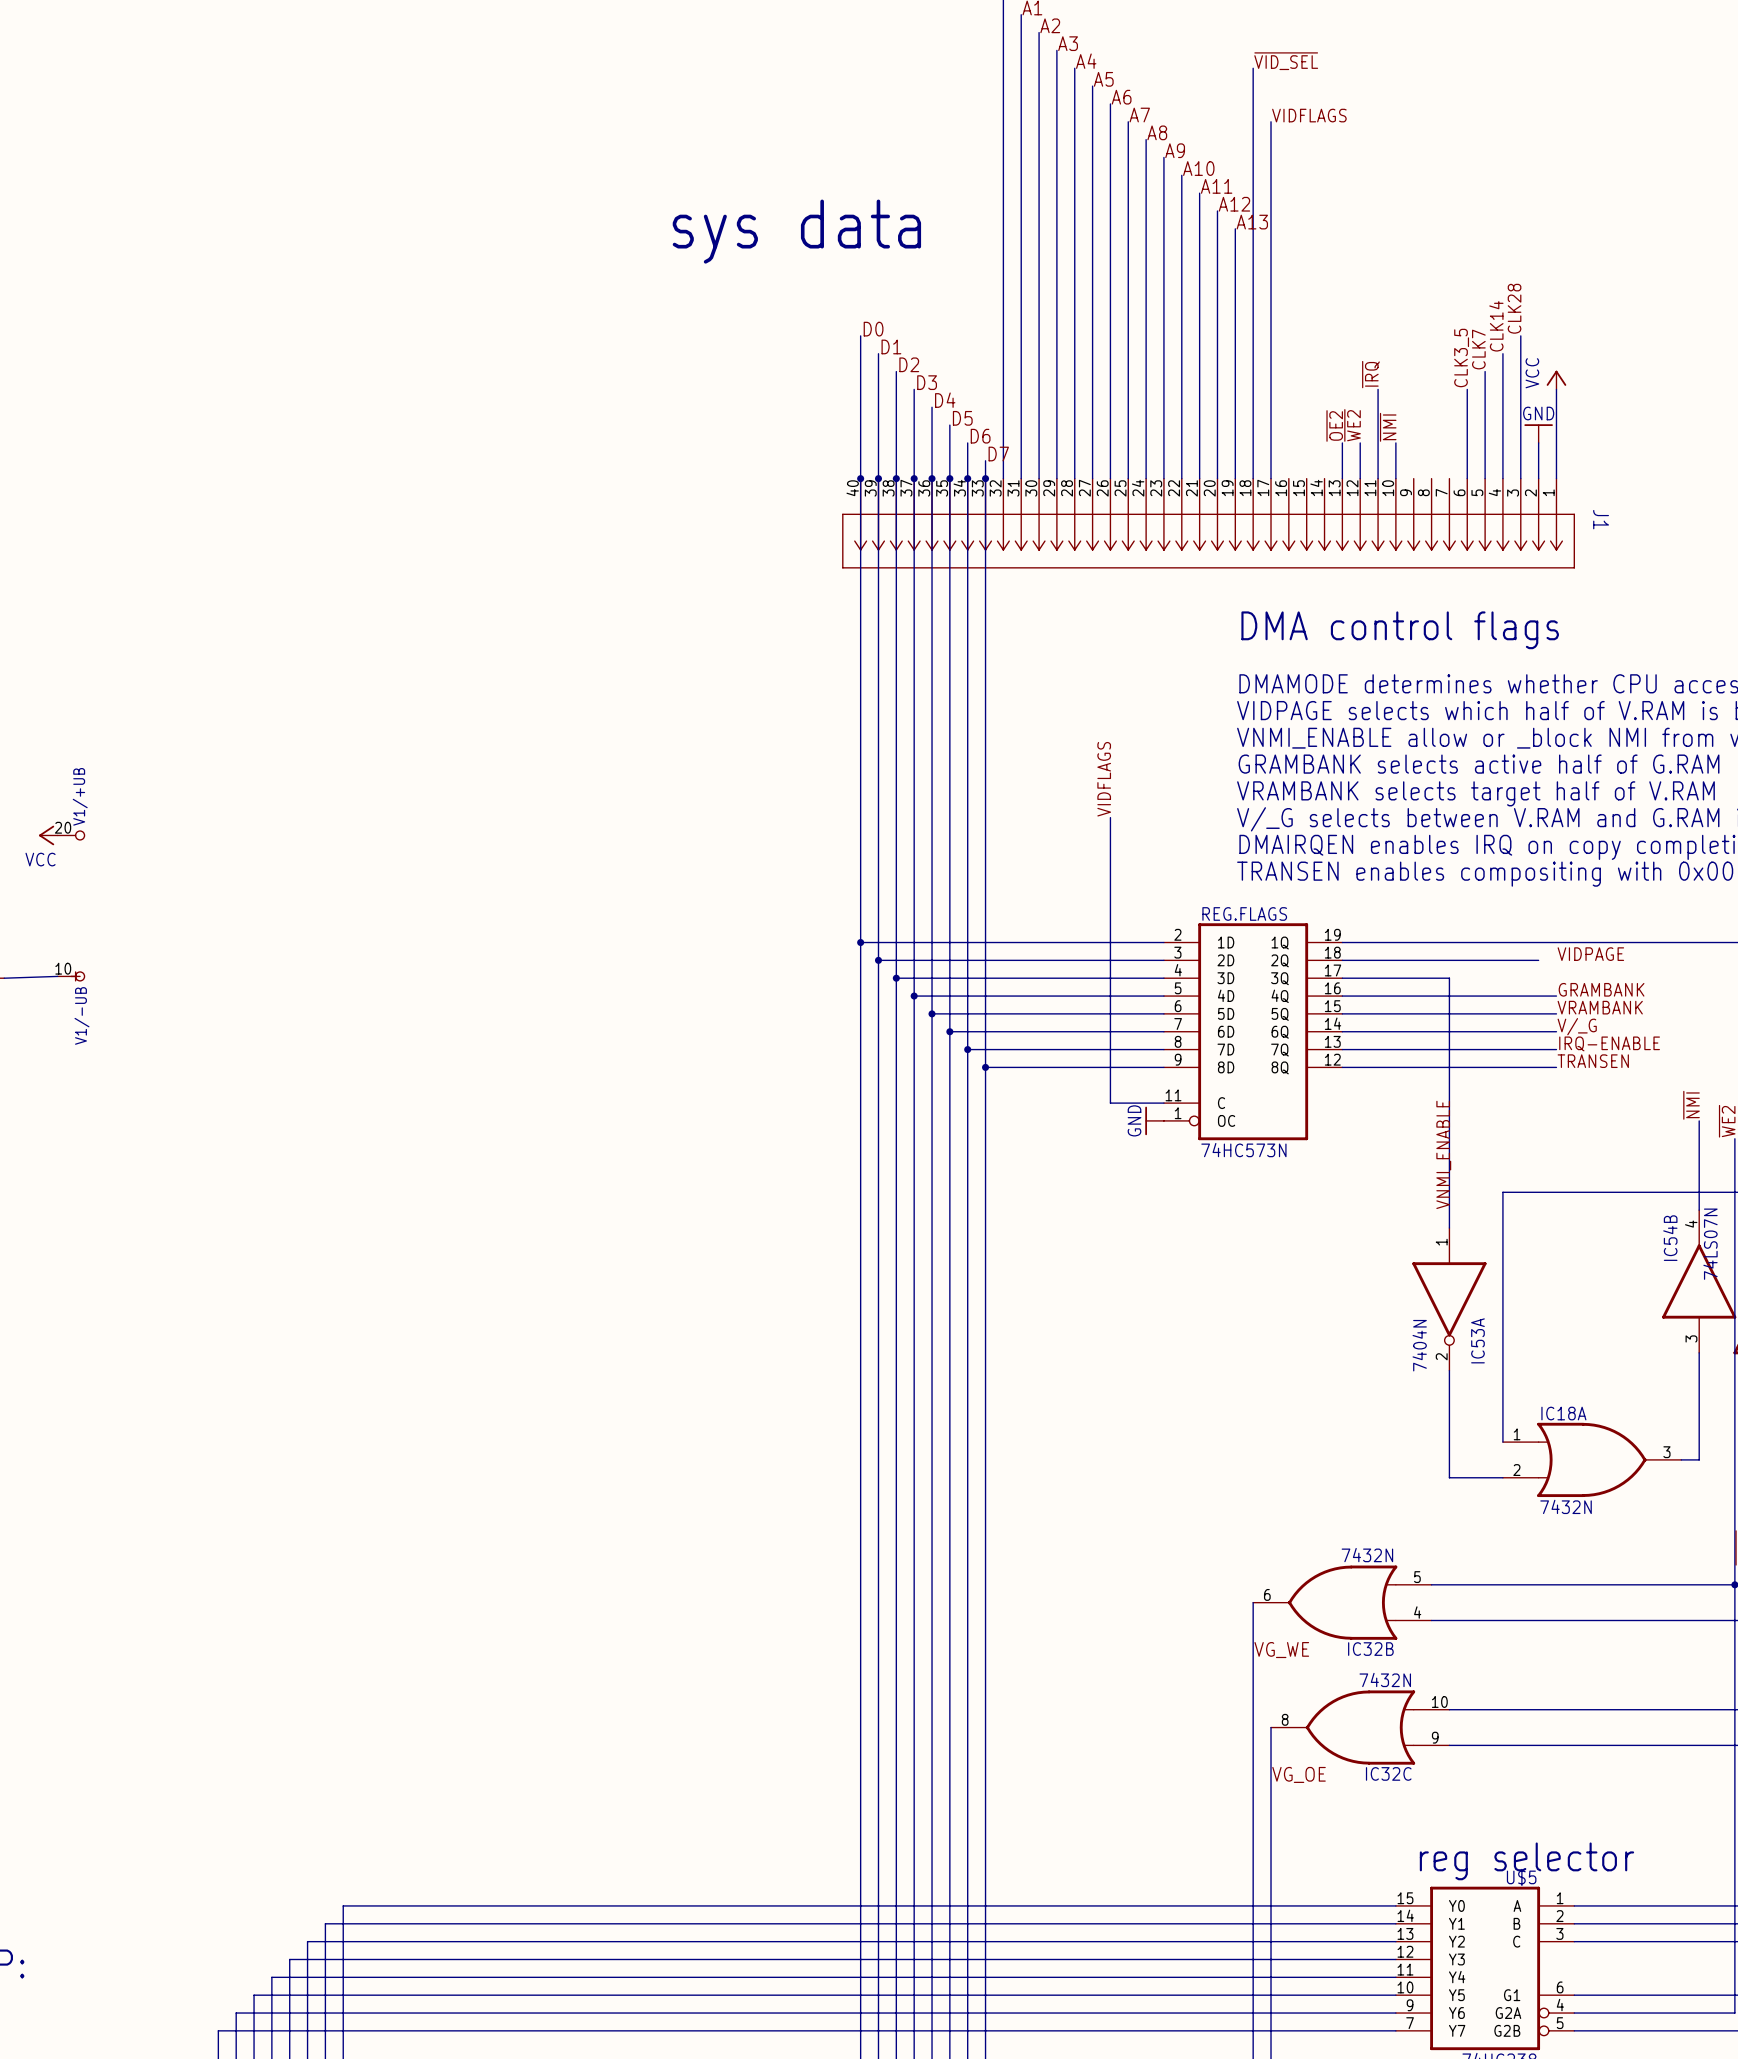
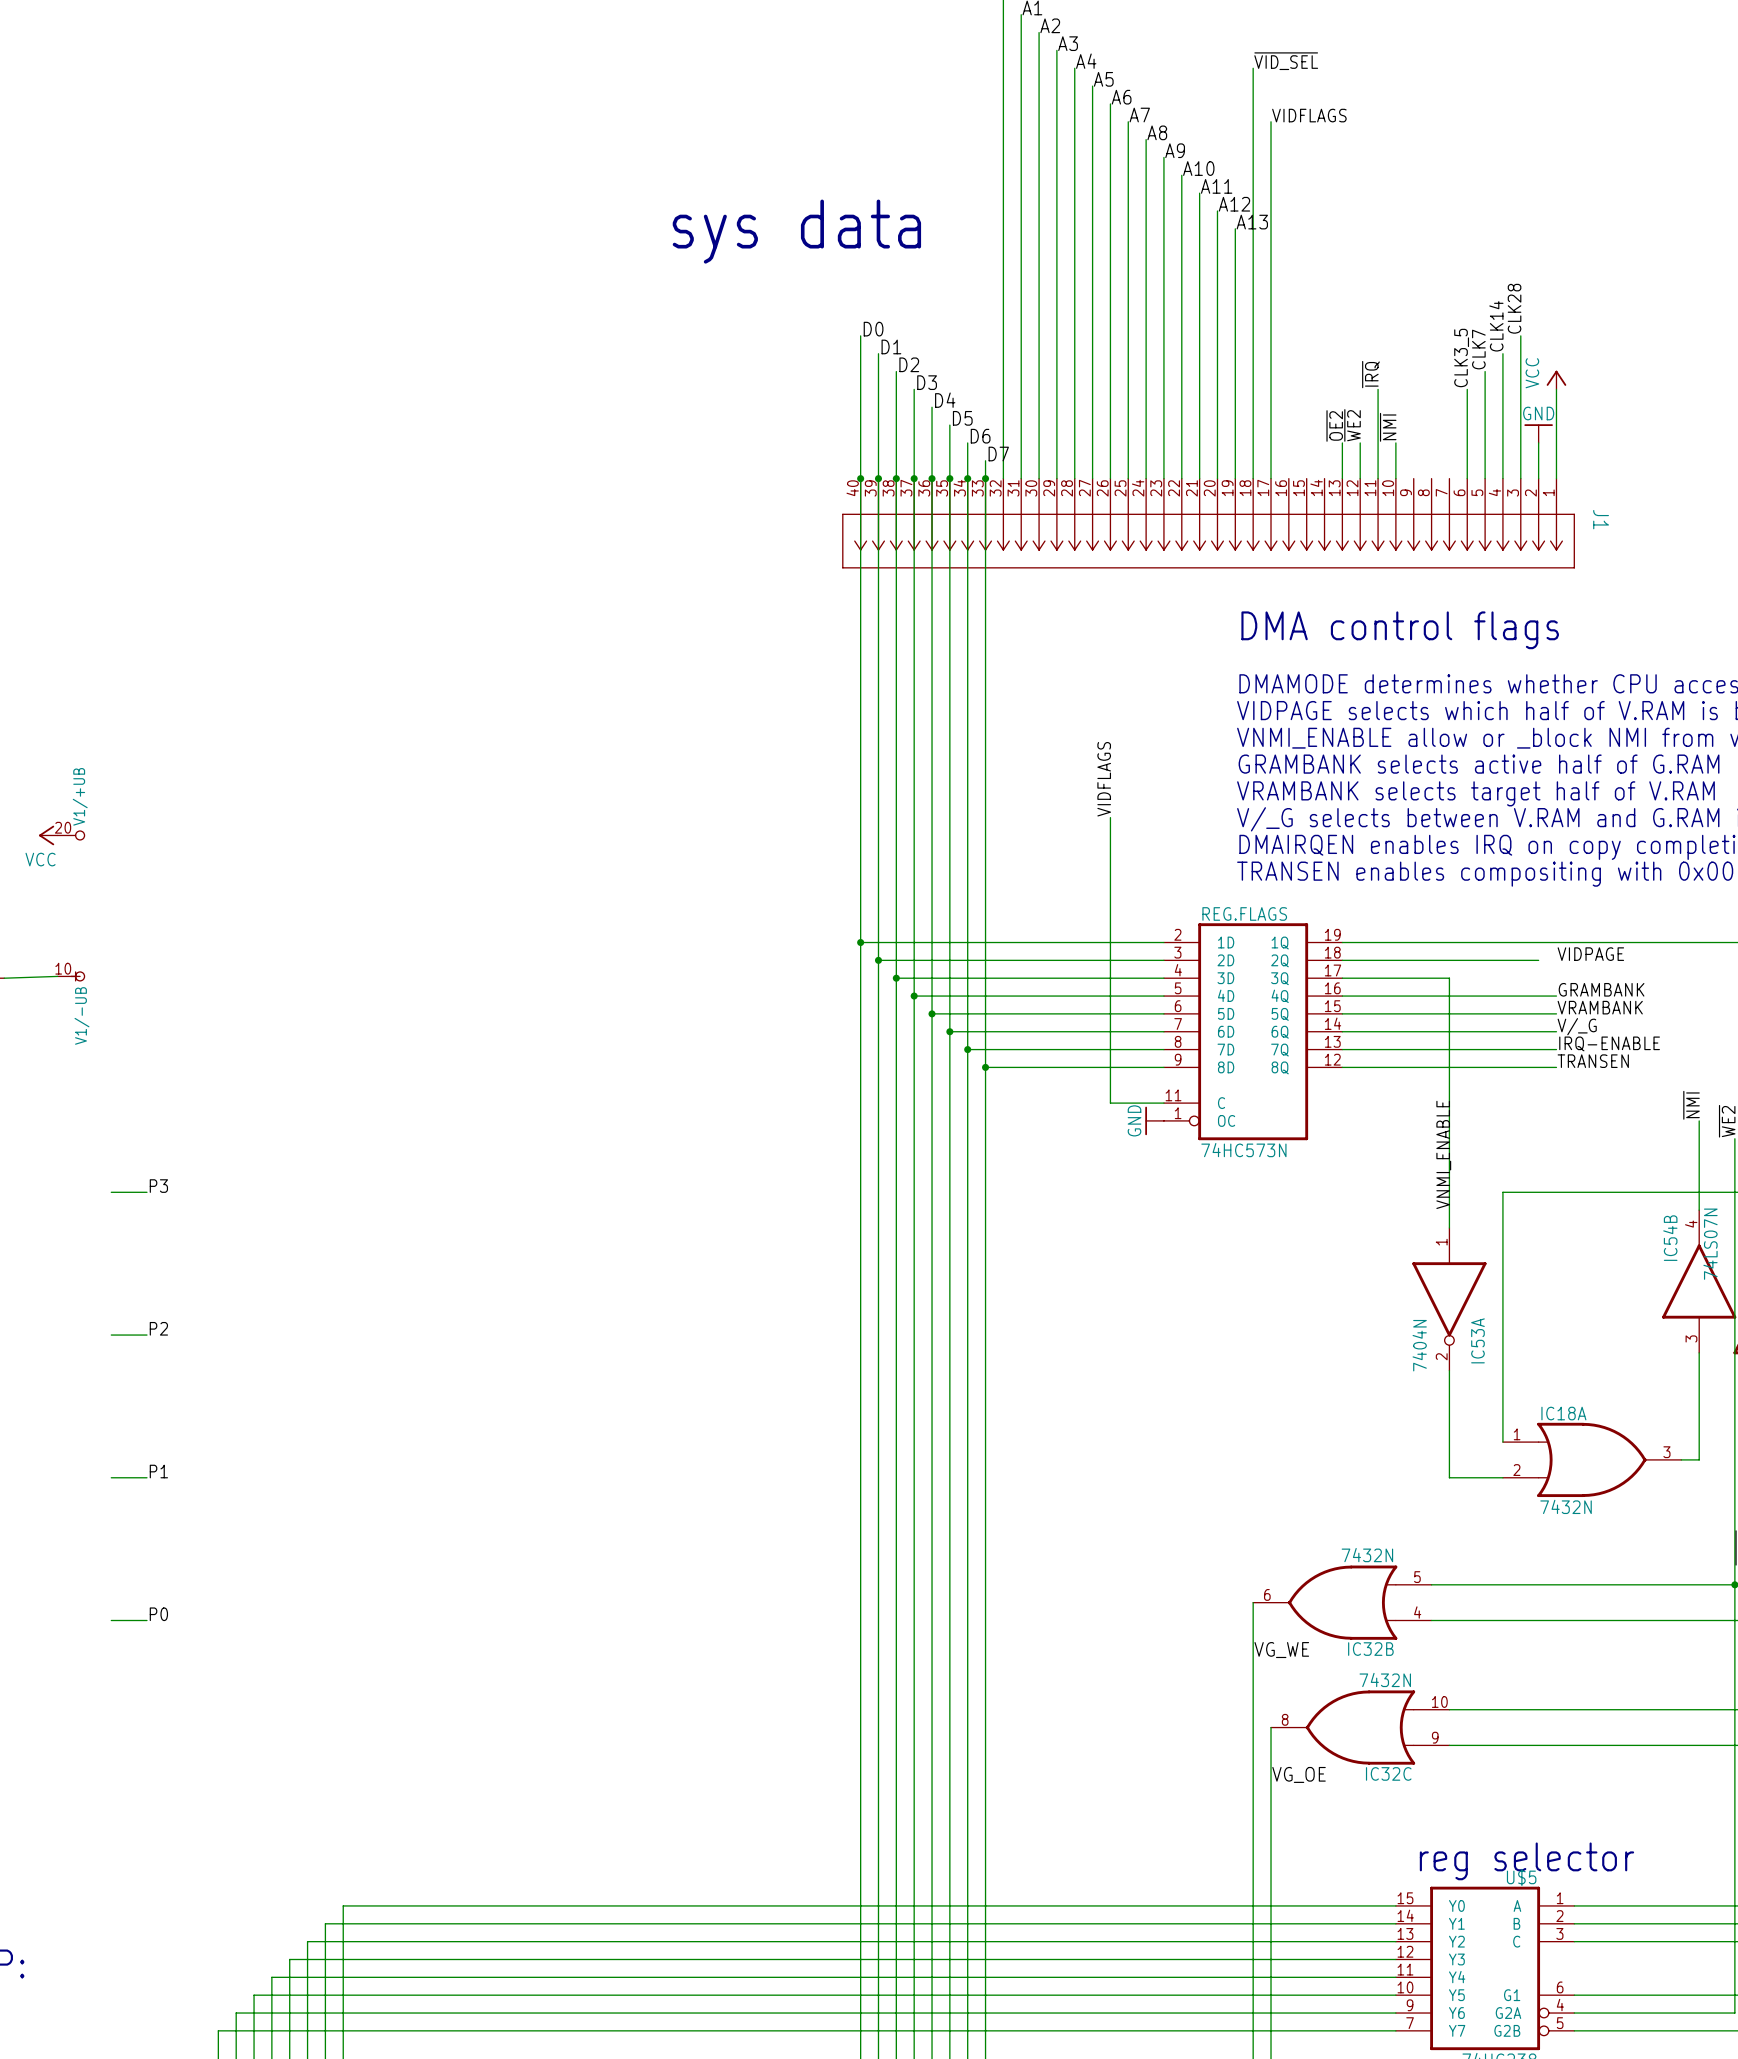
label: none -> P3 (158, 1186)
wire: none -> (111, 1192) (146, 1192)
label: none -> P2 (158, 1328)
wire: none -> (111, 1335) (146, 1335)
label: none -> P1 (158, 1471)
wire: none -> (111, 1477) (146, 1477)
label: none -> P0 (158, 1614)
wire: none -> (111, 1620) (146, 1620)

